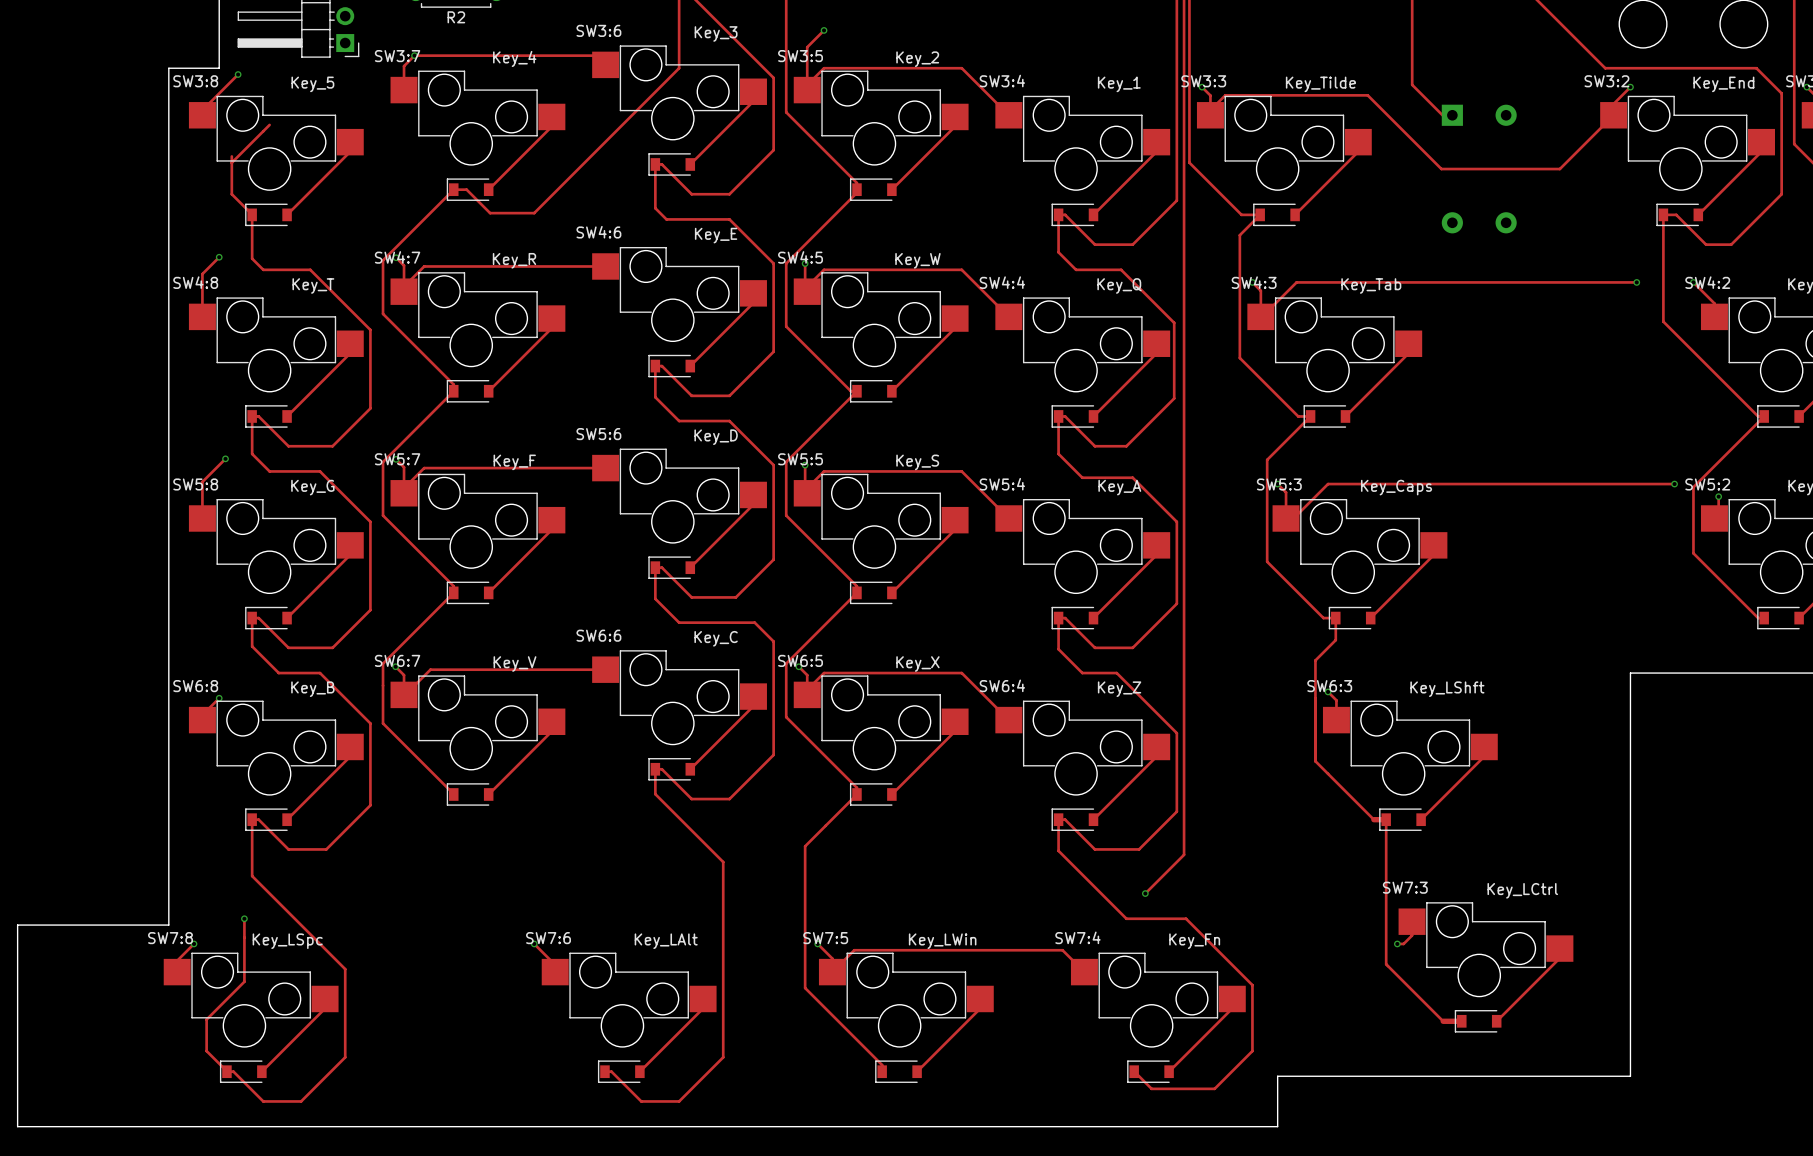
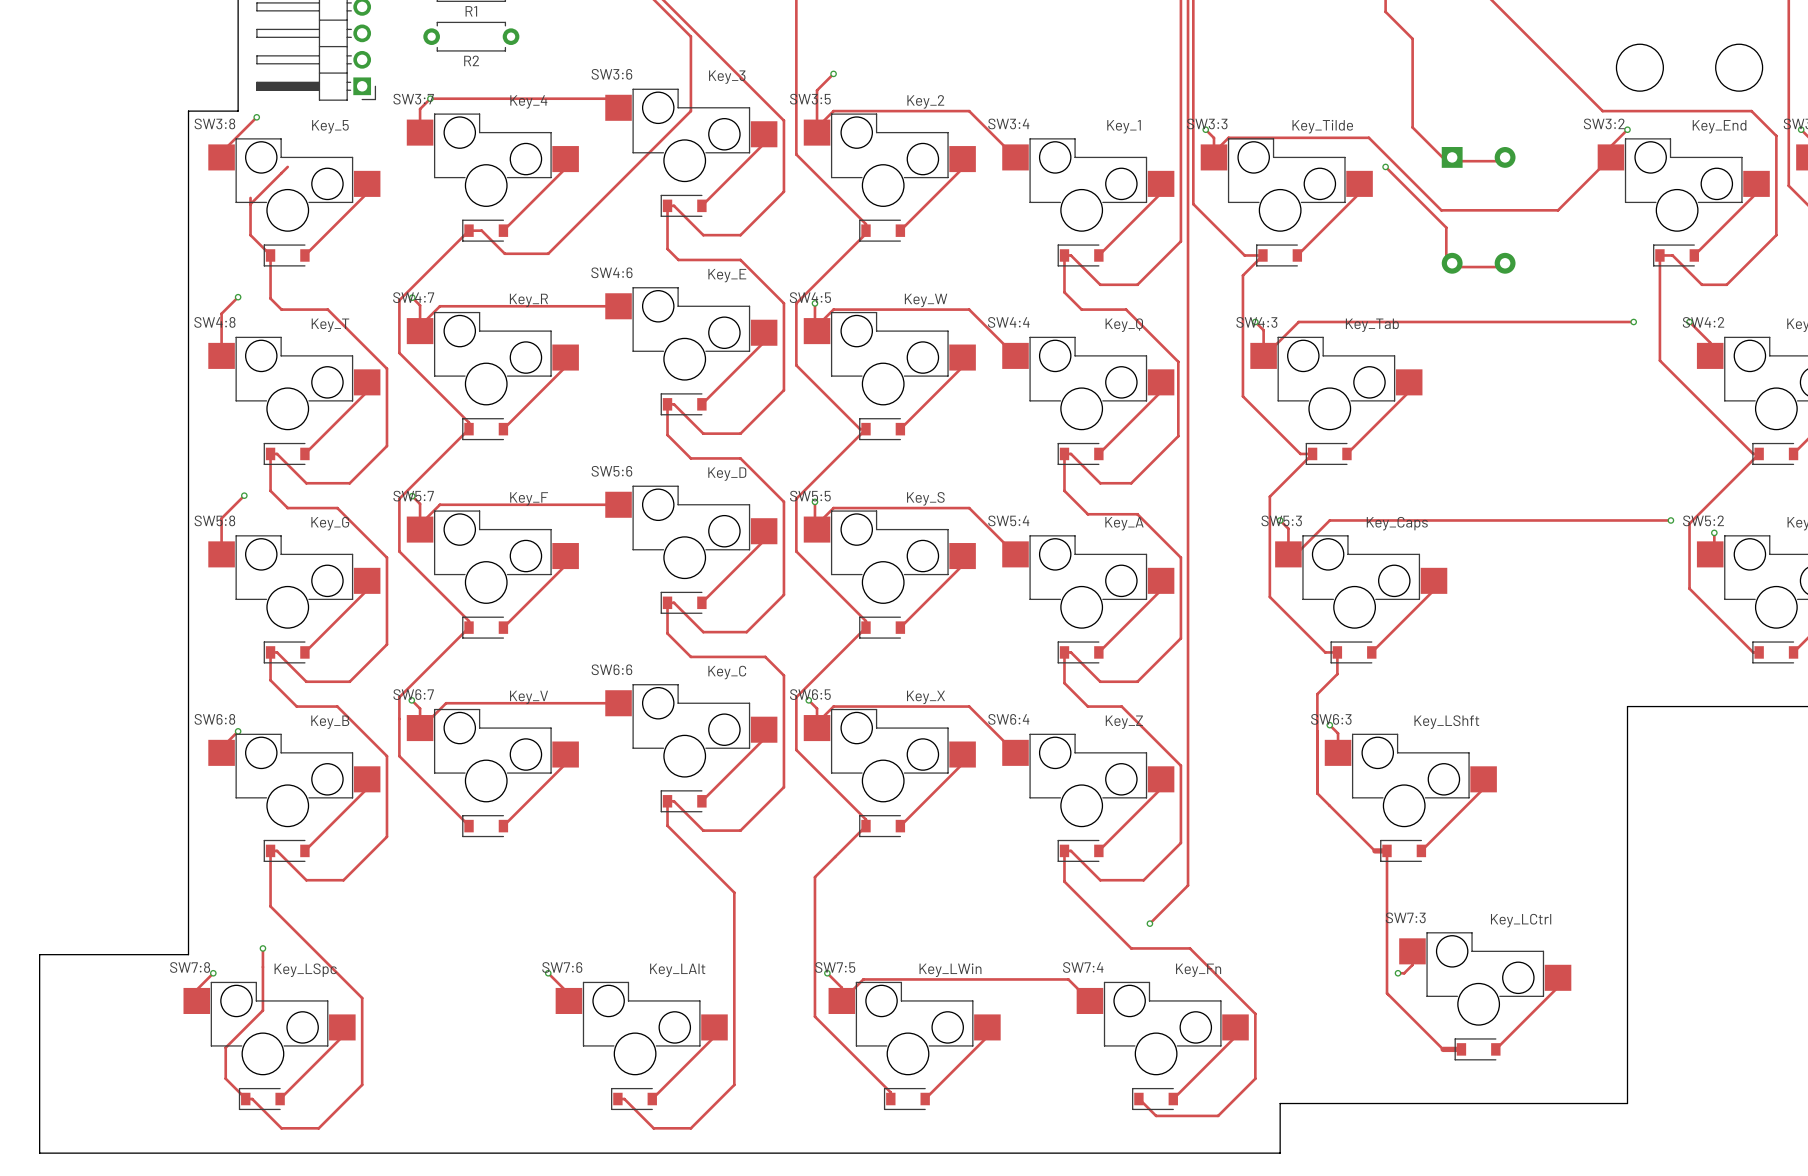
track: none -> (1446, 161) (1499, 161)
track: none -> (1385, 166) (1446, 227) (1446, 267) (1499, 267)
via: none -> (1385, 166)

